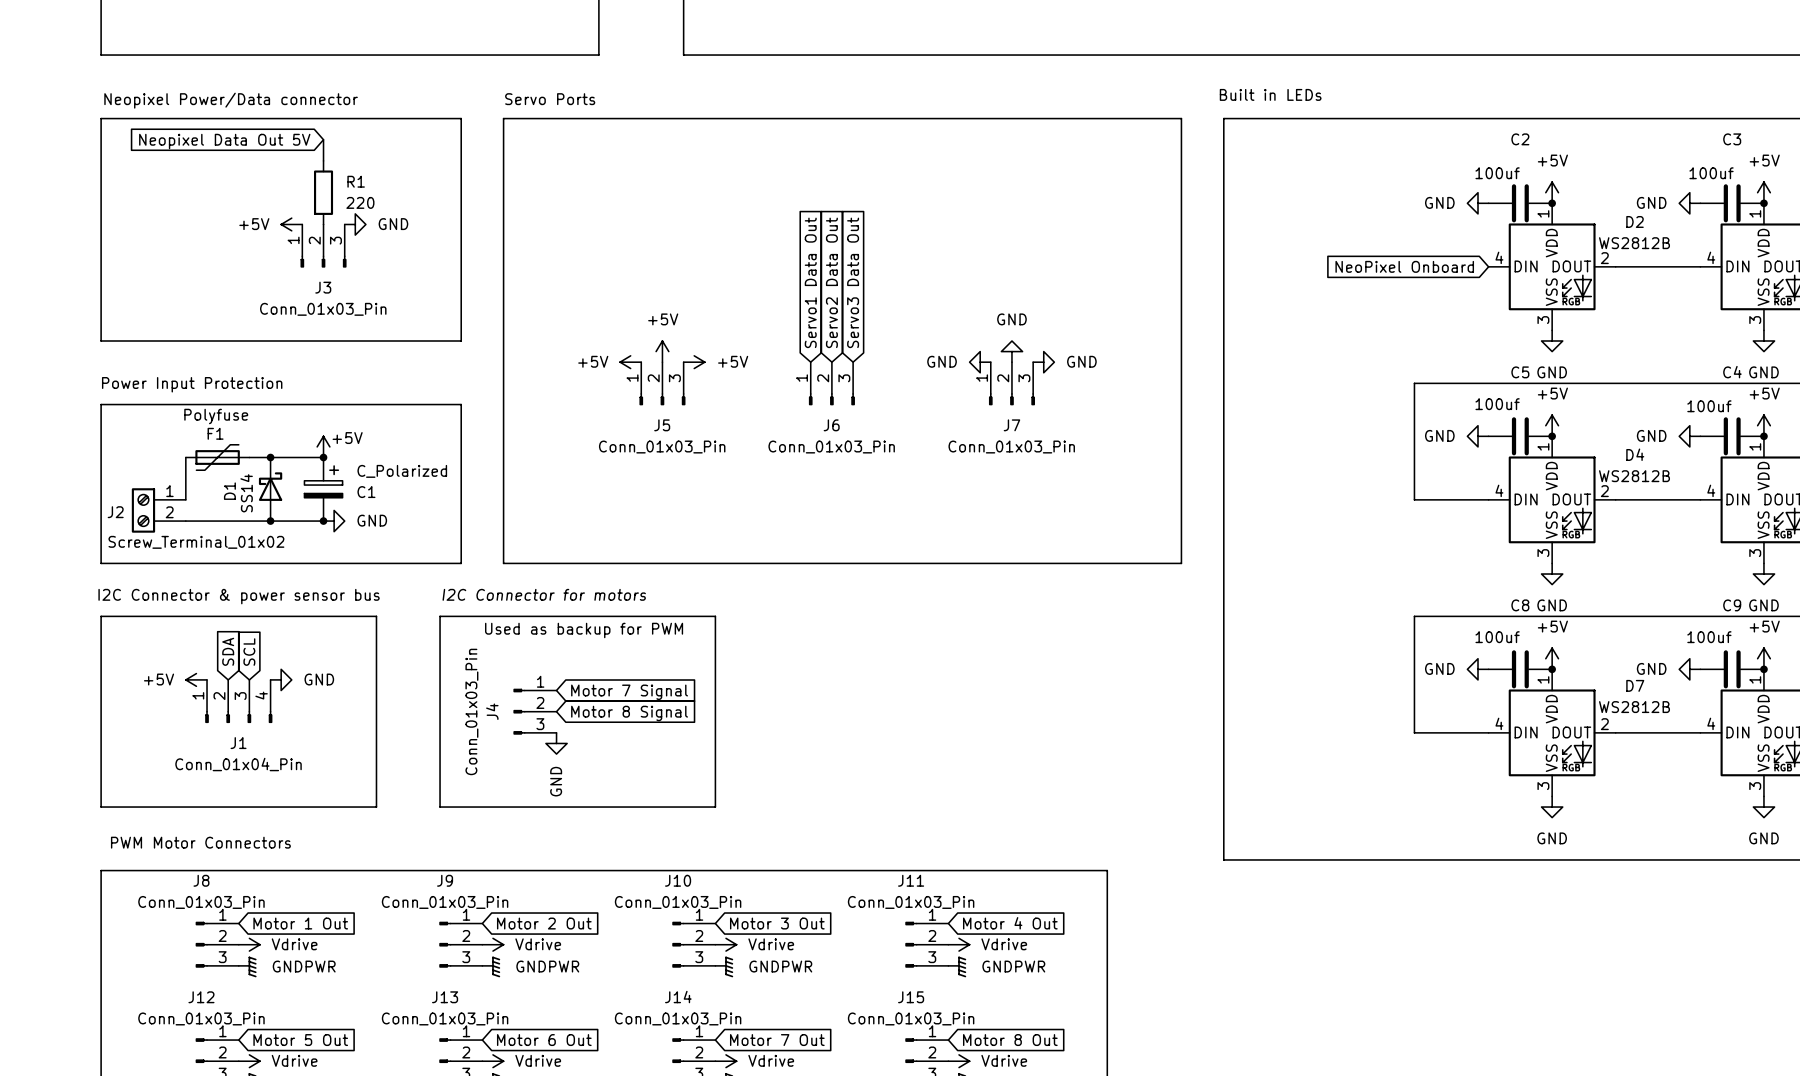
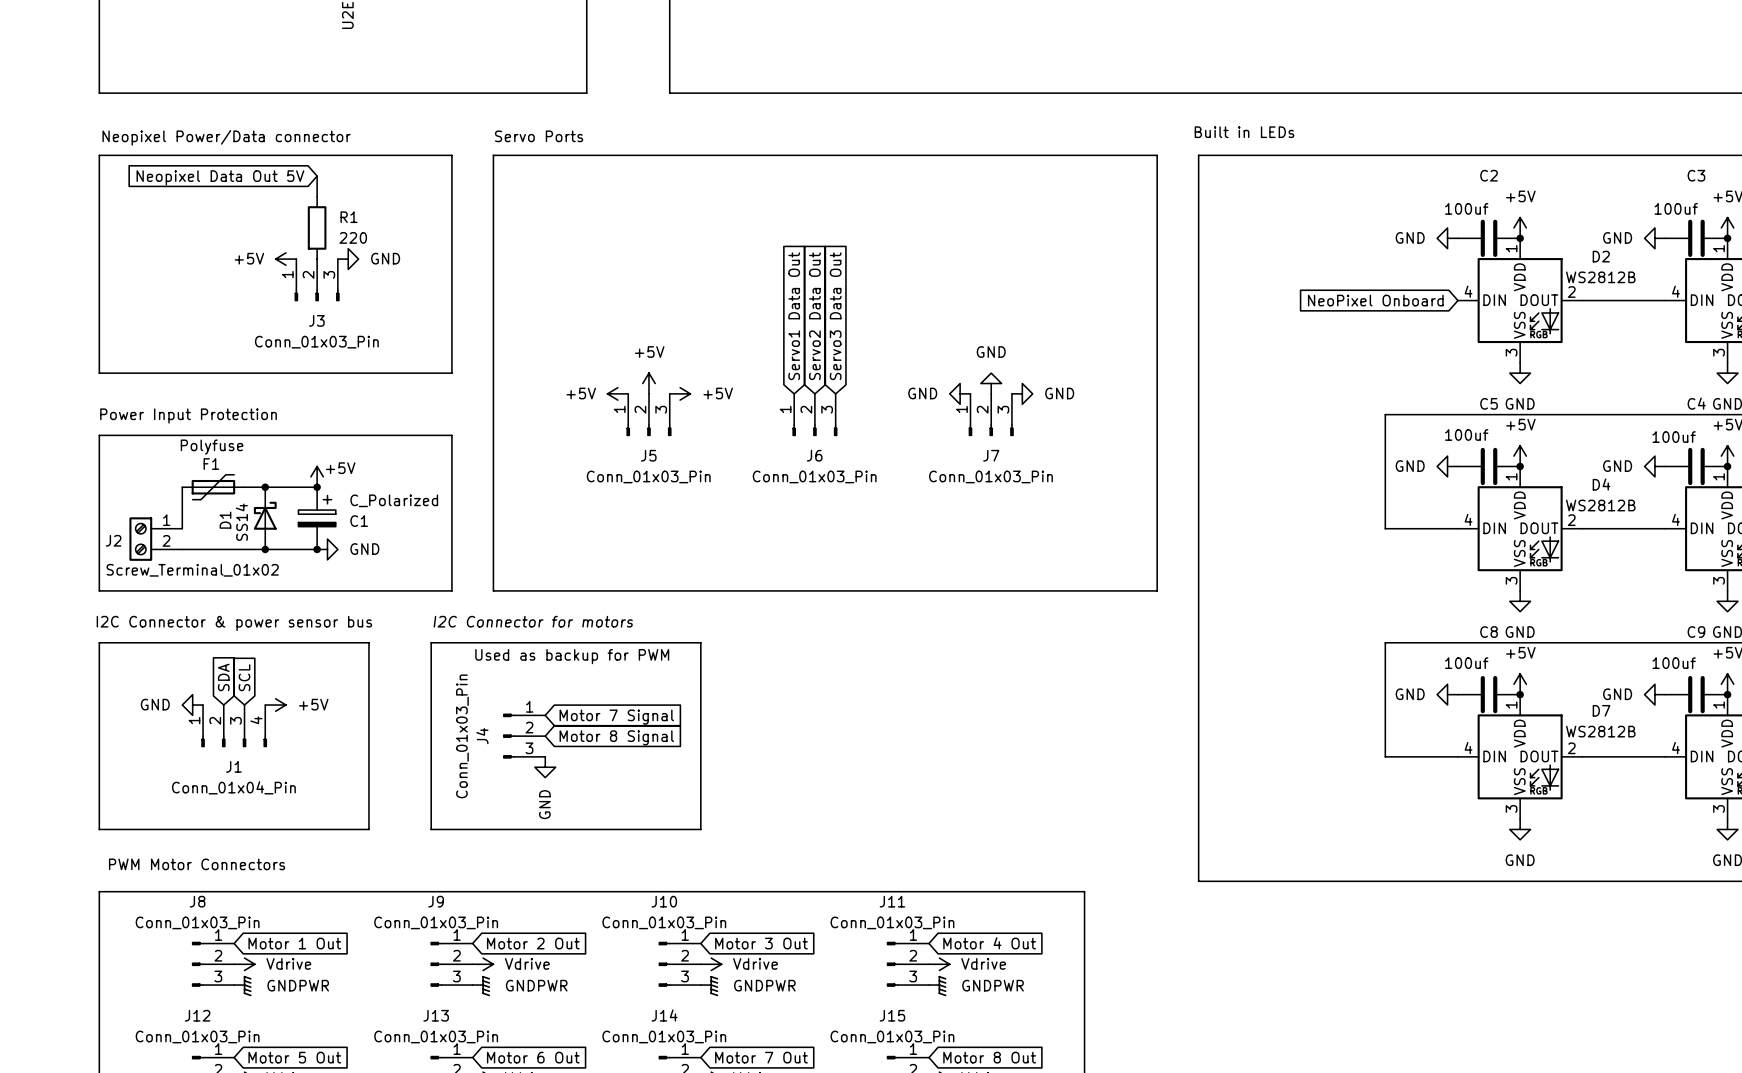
power symbol: +5V (196, 679) -> GND (192, 705)
power symbol: GND (281, 679) -> +5V (275, 705)

